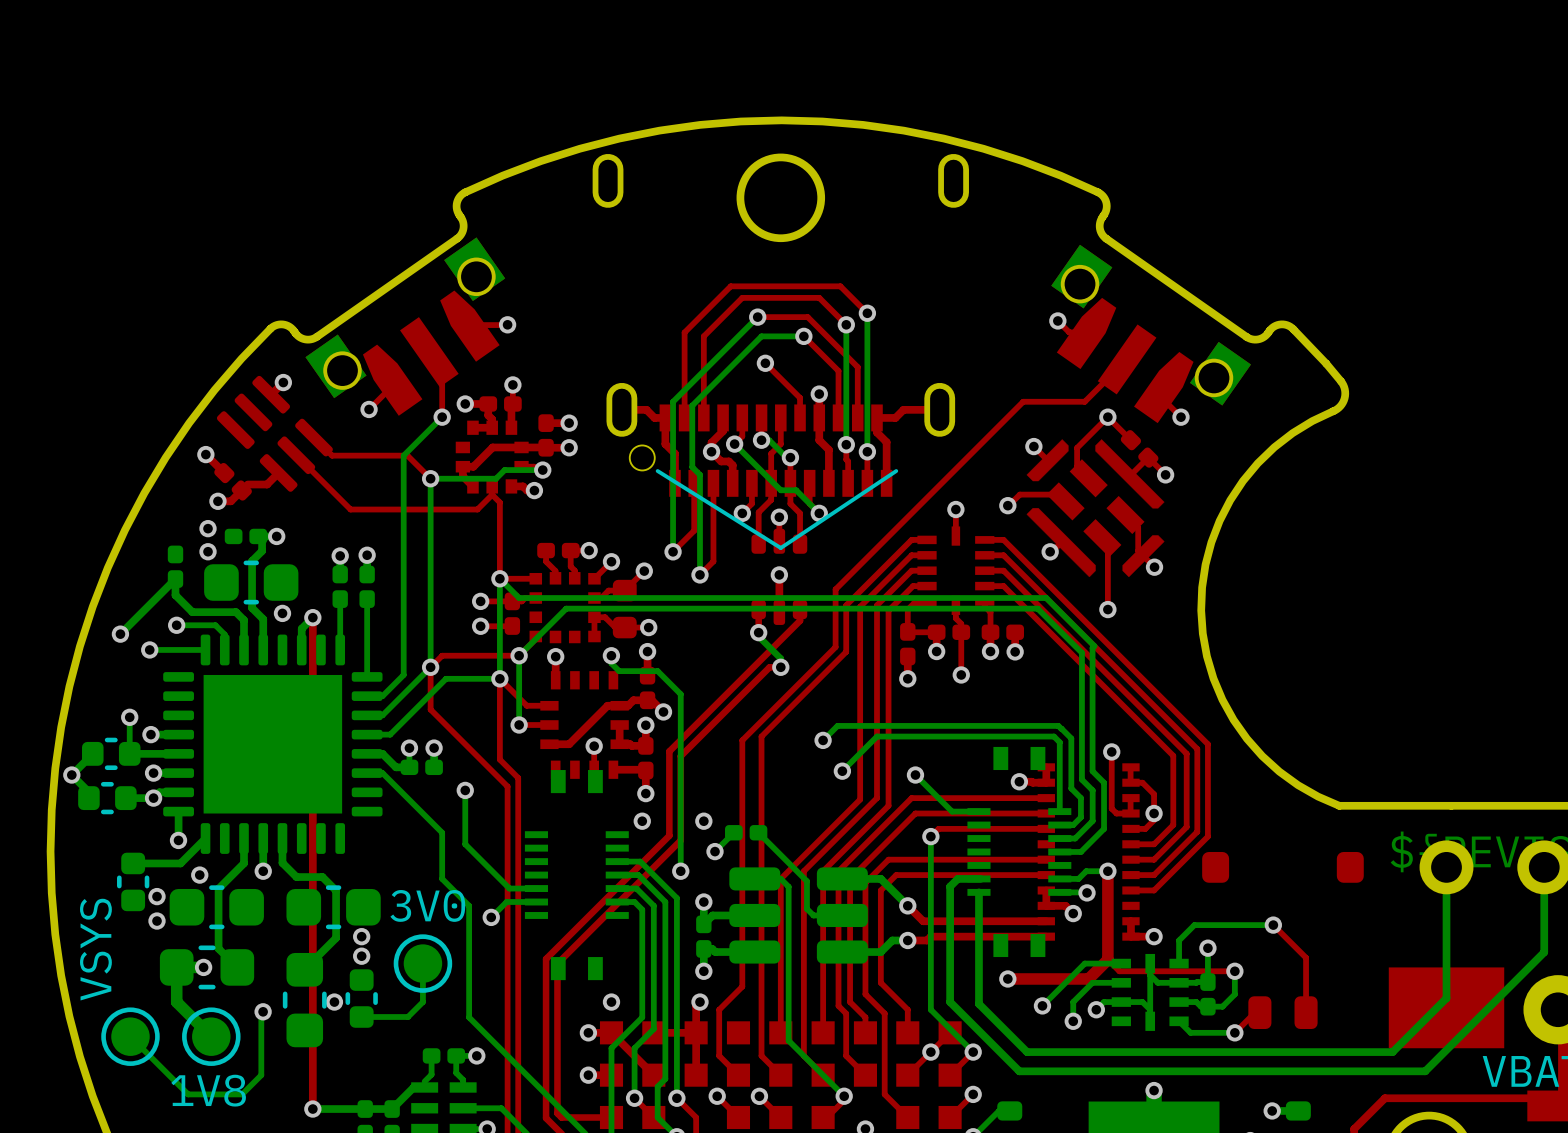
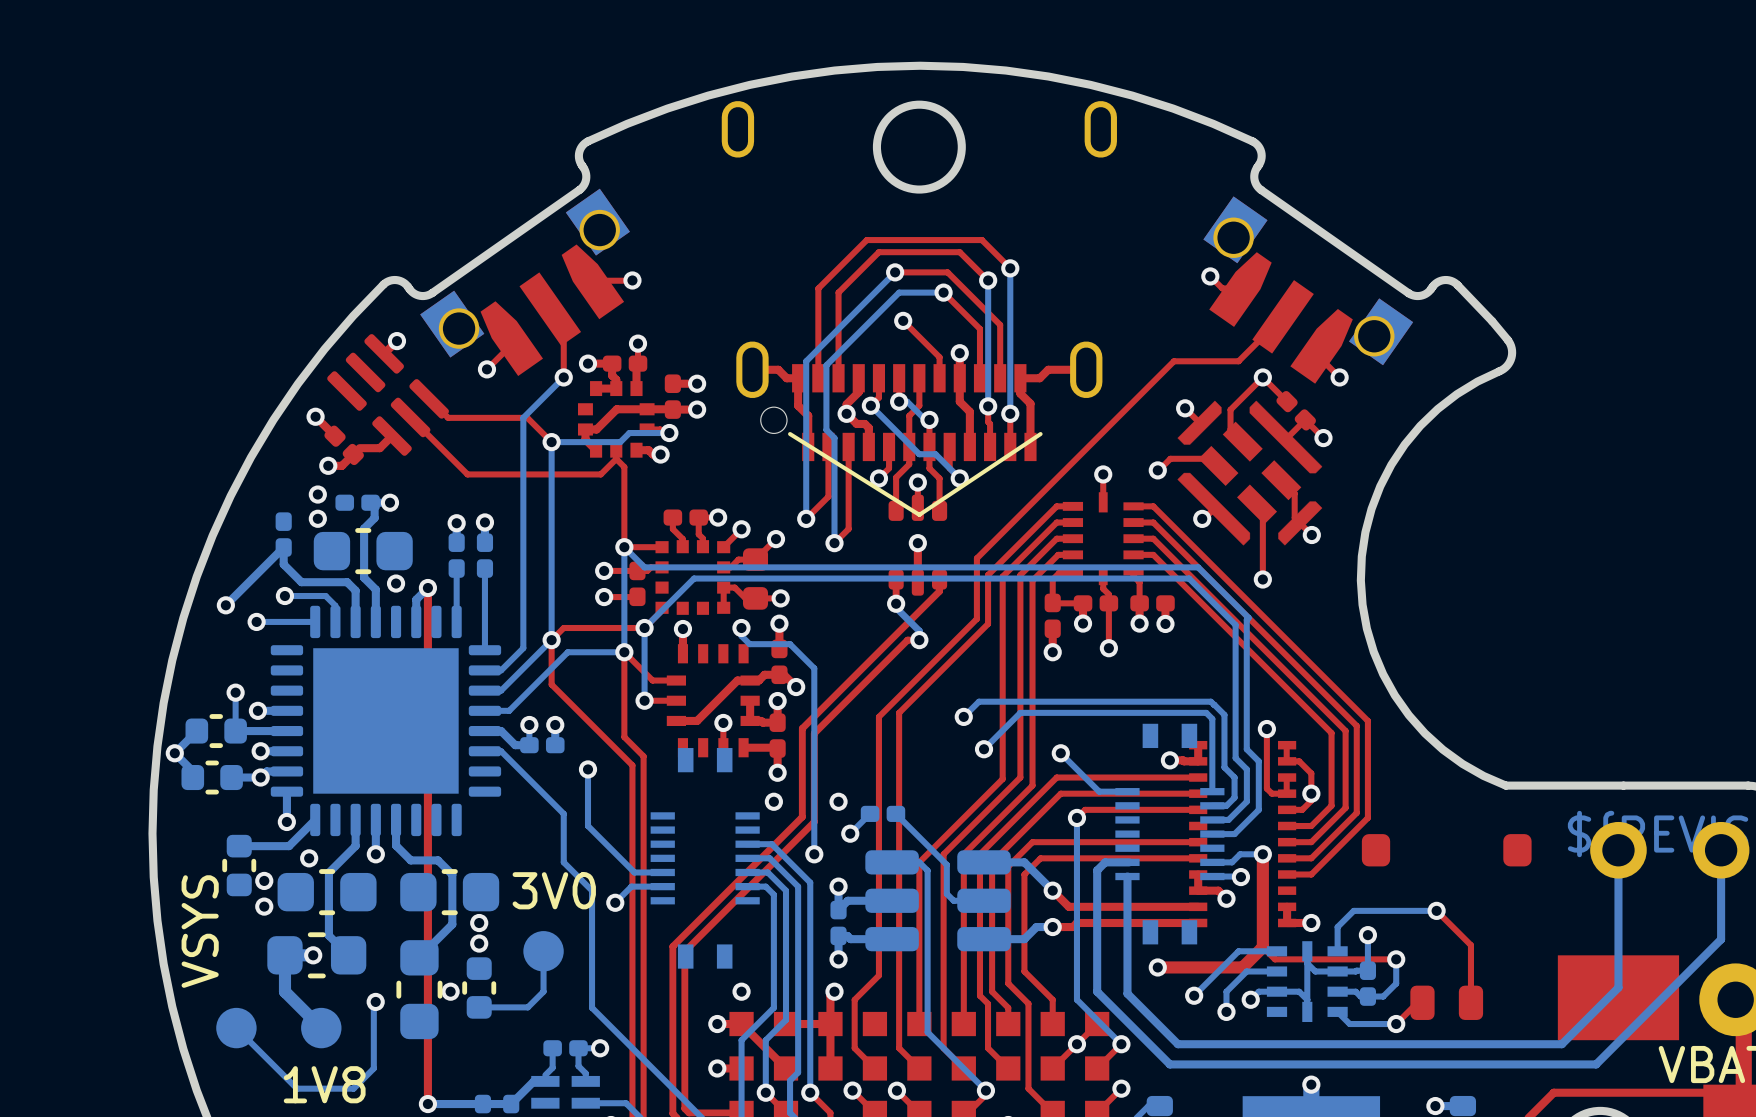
part footprint: [393, 934, 453, 993] -> [523, 931, 564, 972]
part footprint: [101, 1007, 160, 1066] -> [216, 1007, 257, 1049]
part footprint: [182, 1007, 241, 1066] -> [301, 1007, 342, 1049]

